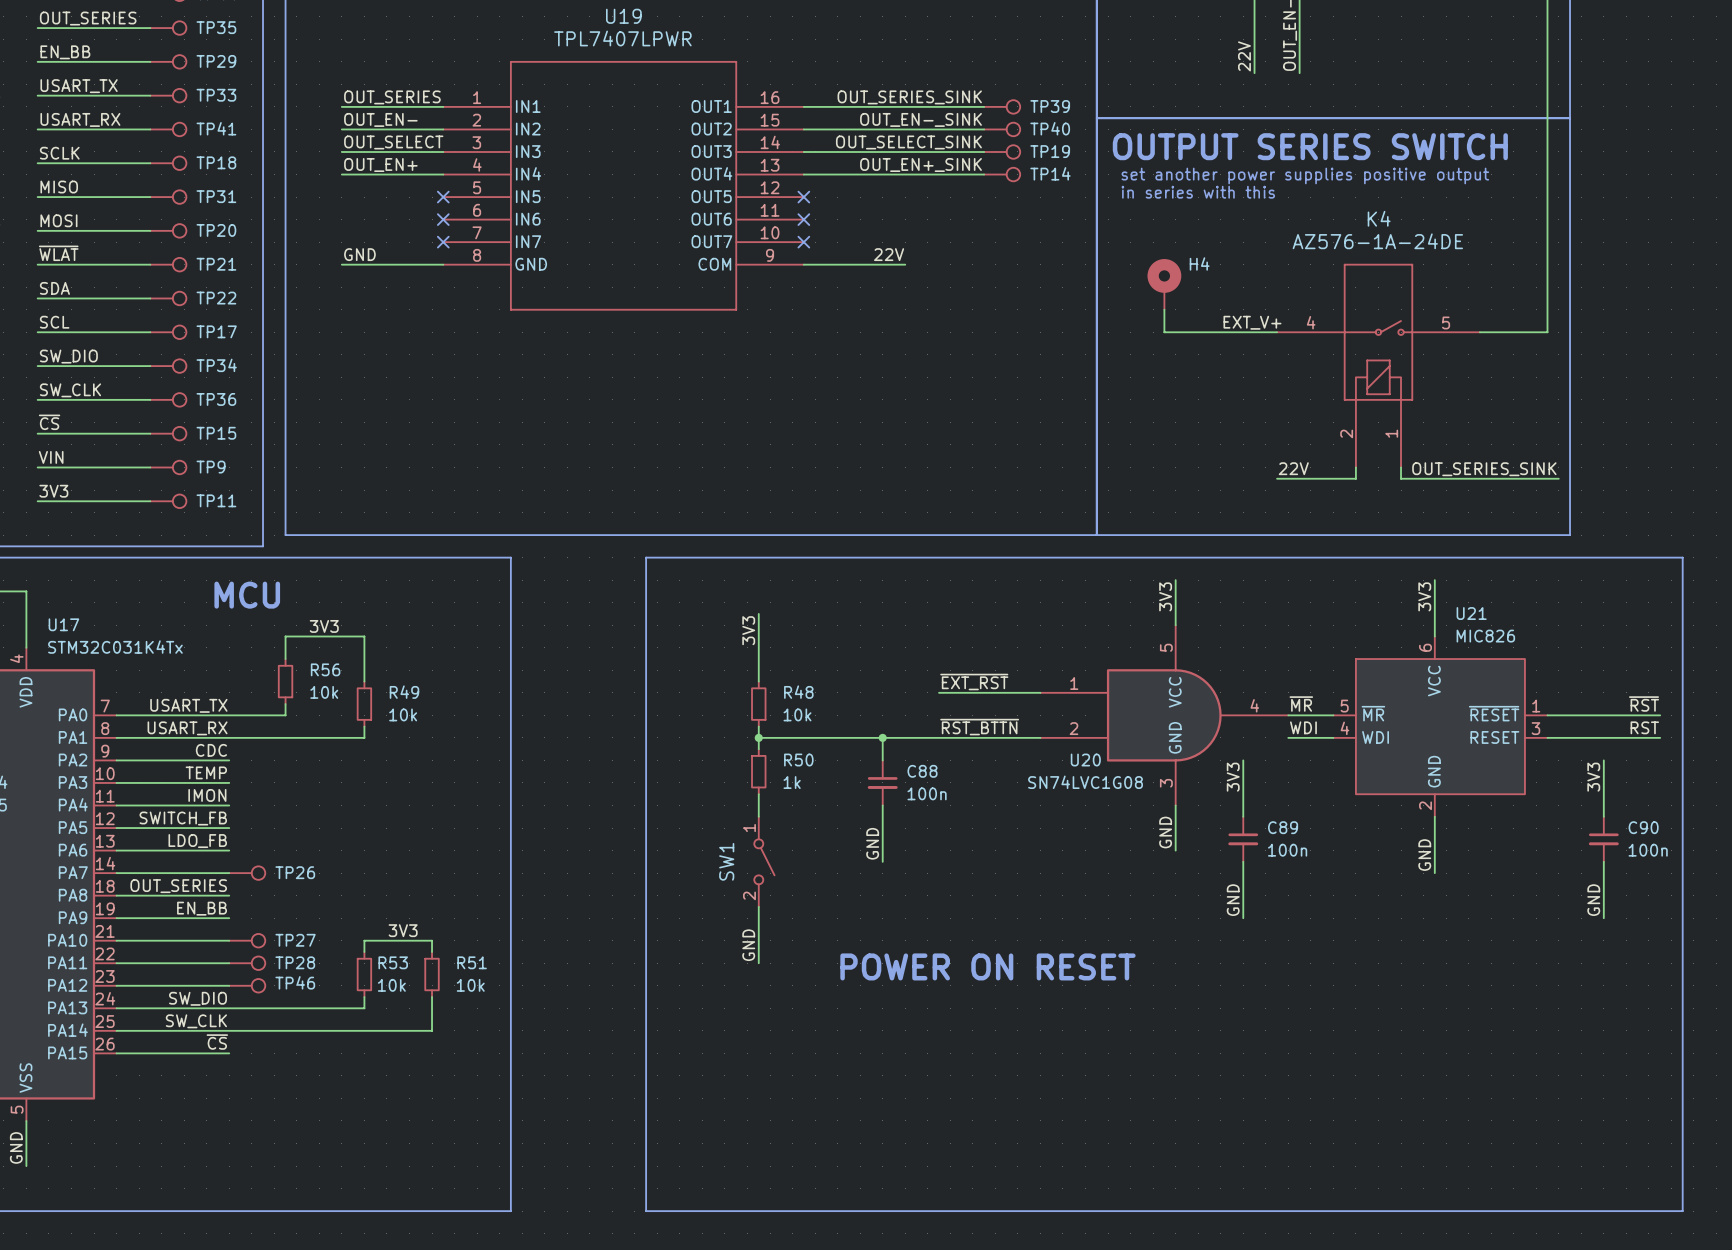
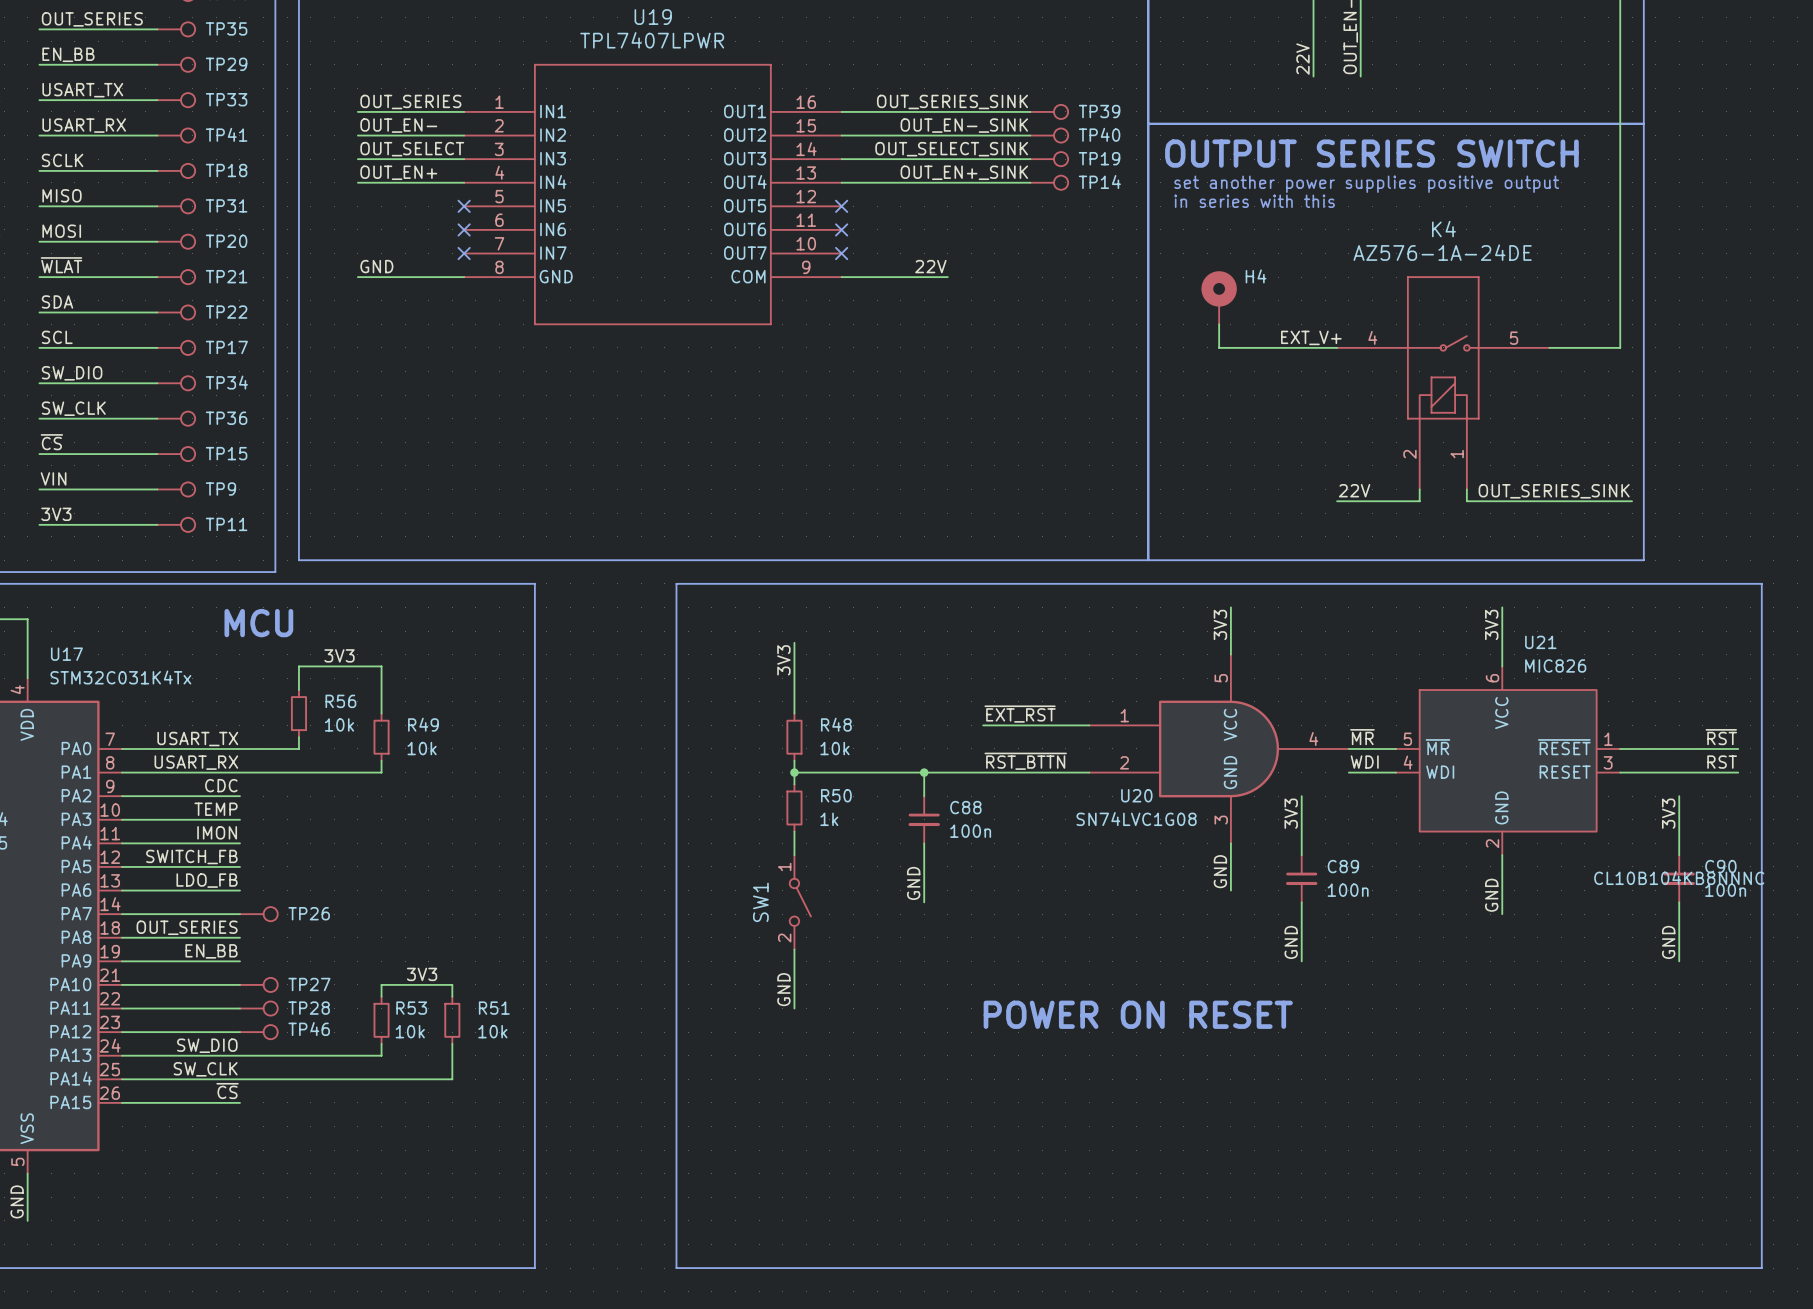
C90 text: none -> CL10B104KB8NNNC (1679, 878)
text position: POWER ON RESET (987, 966) -> POWER ON RESET (1138, 1014)

